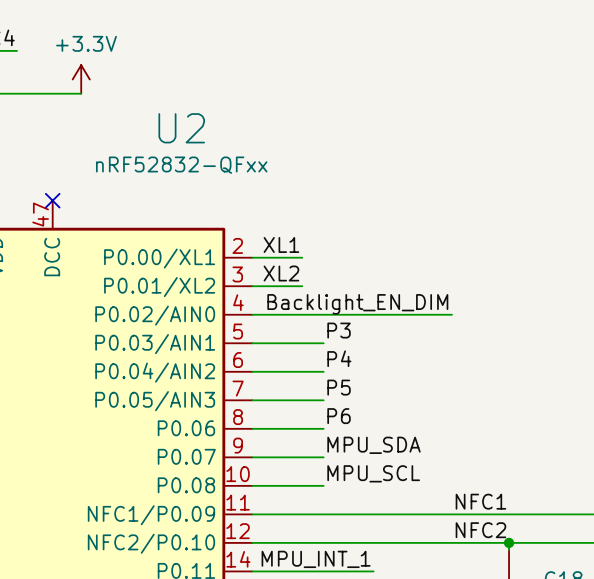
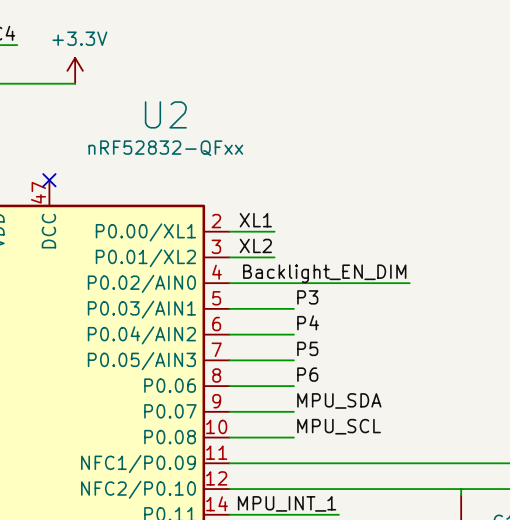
label: NFC1 (480, 501) -> none
label: NFC2 (480, 530) -> none
junction: (509, 542) -> none

